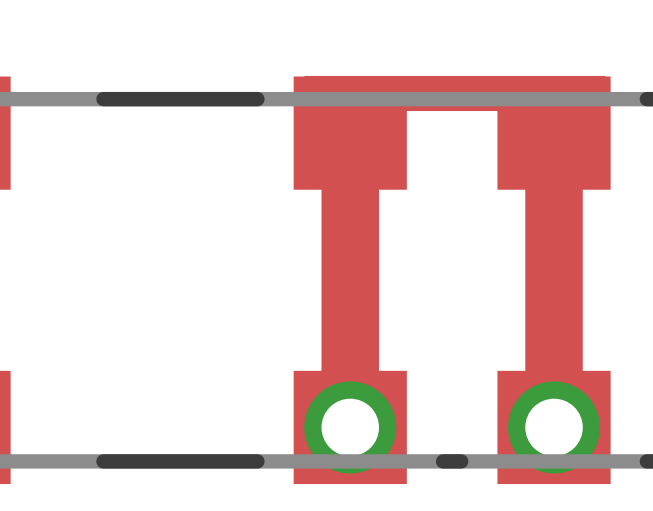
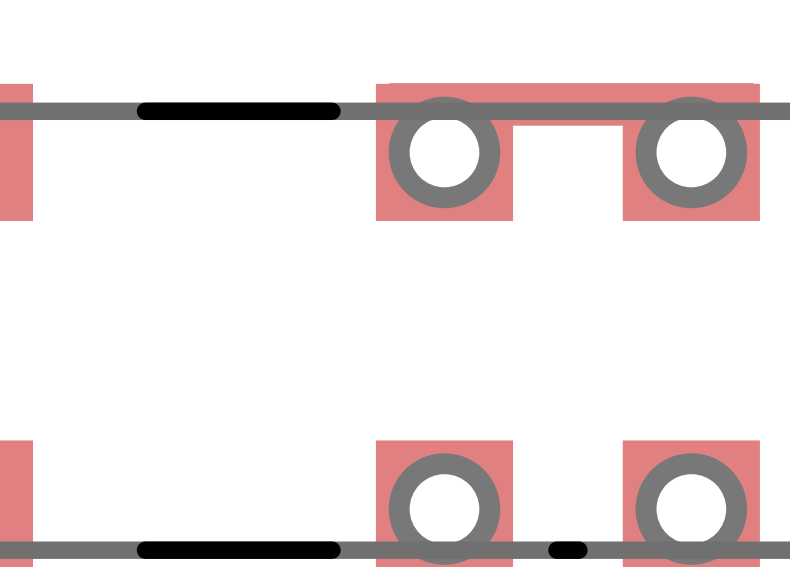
top track: (350, 133) (350, 427) -> none
via: none -> (444, 152)
top track: (554, 133) (554, 427) -> none
via: none -> (691, 152)

